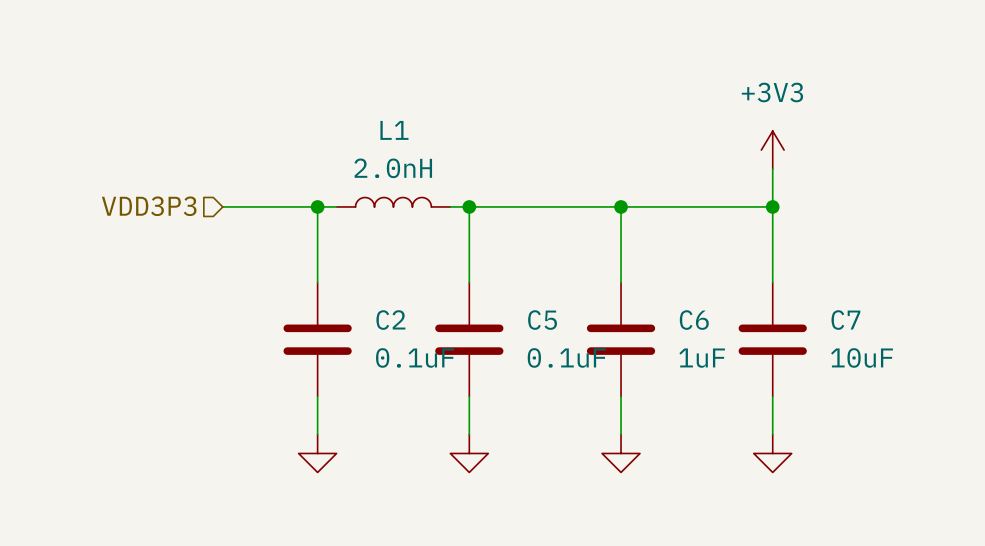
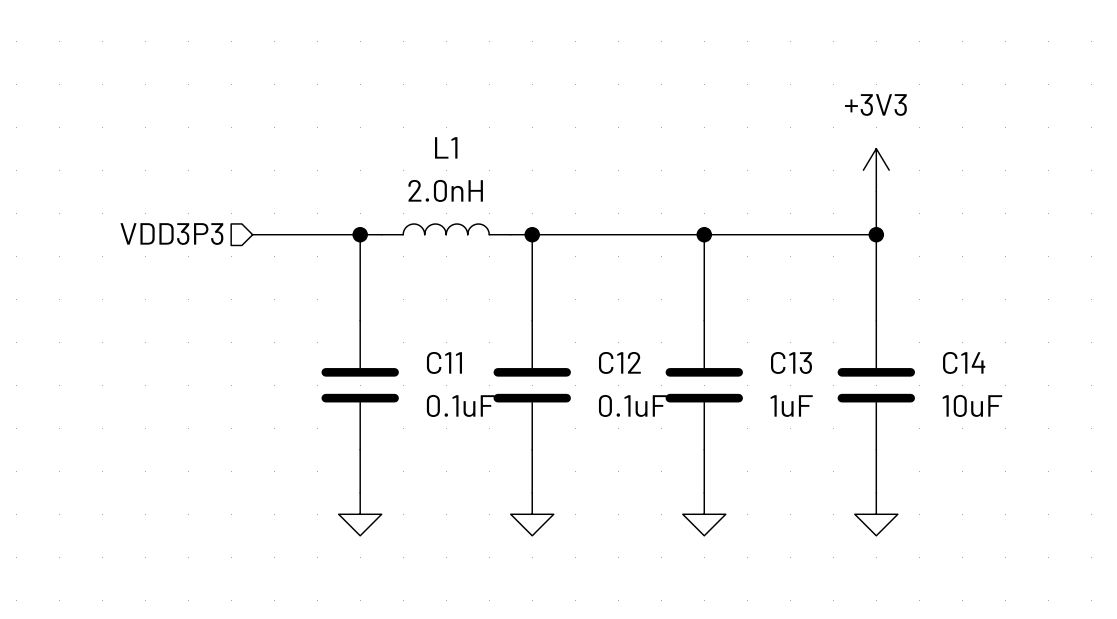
C2 name: C2 (390, 320) -> C11 (444, 362)
C5 name: C5 (542, 320) -> C12 (619, 362)
C6 name: C6 (694, 320) -> C13 (791, 362)
C7 name: C7 (845, 320) -> C14 (964, 362)

